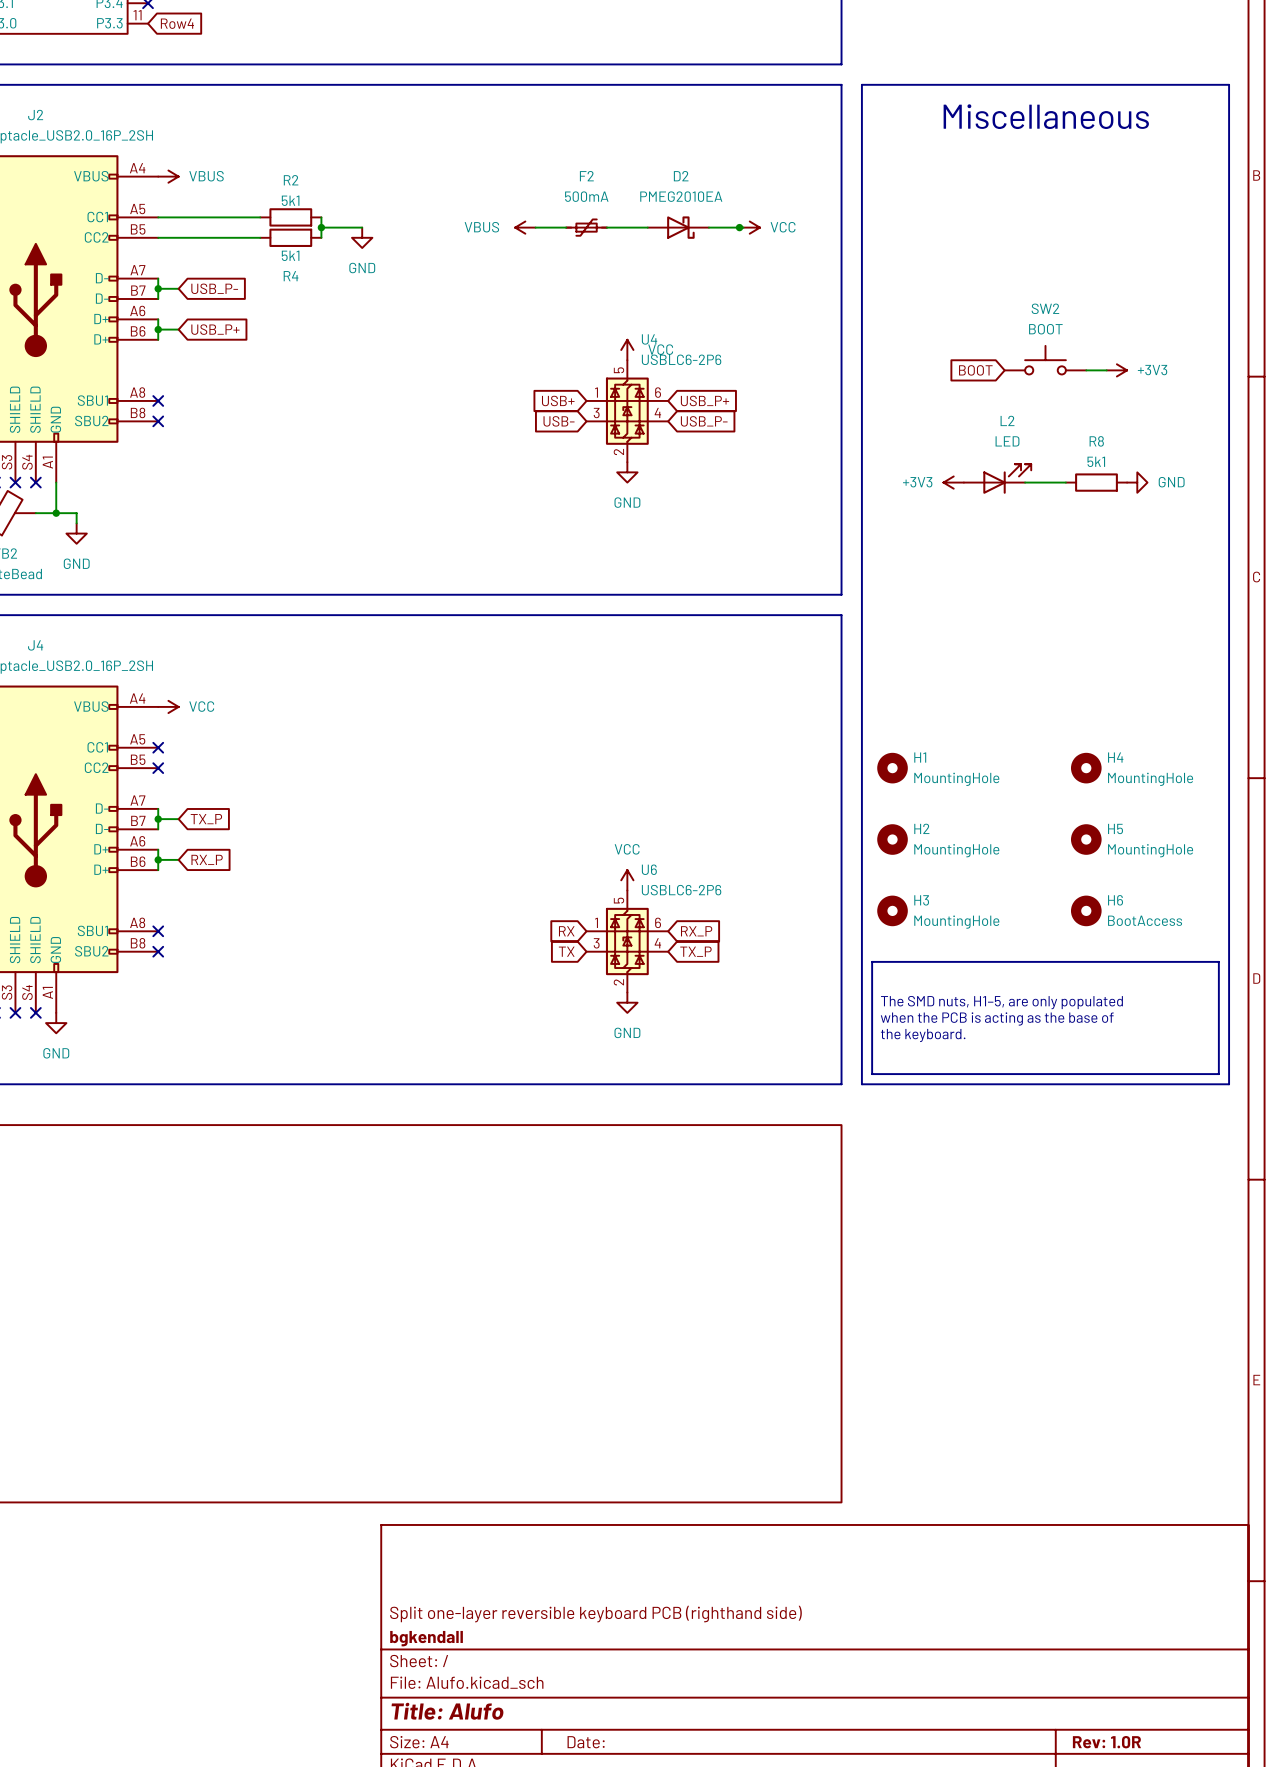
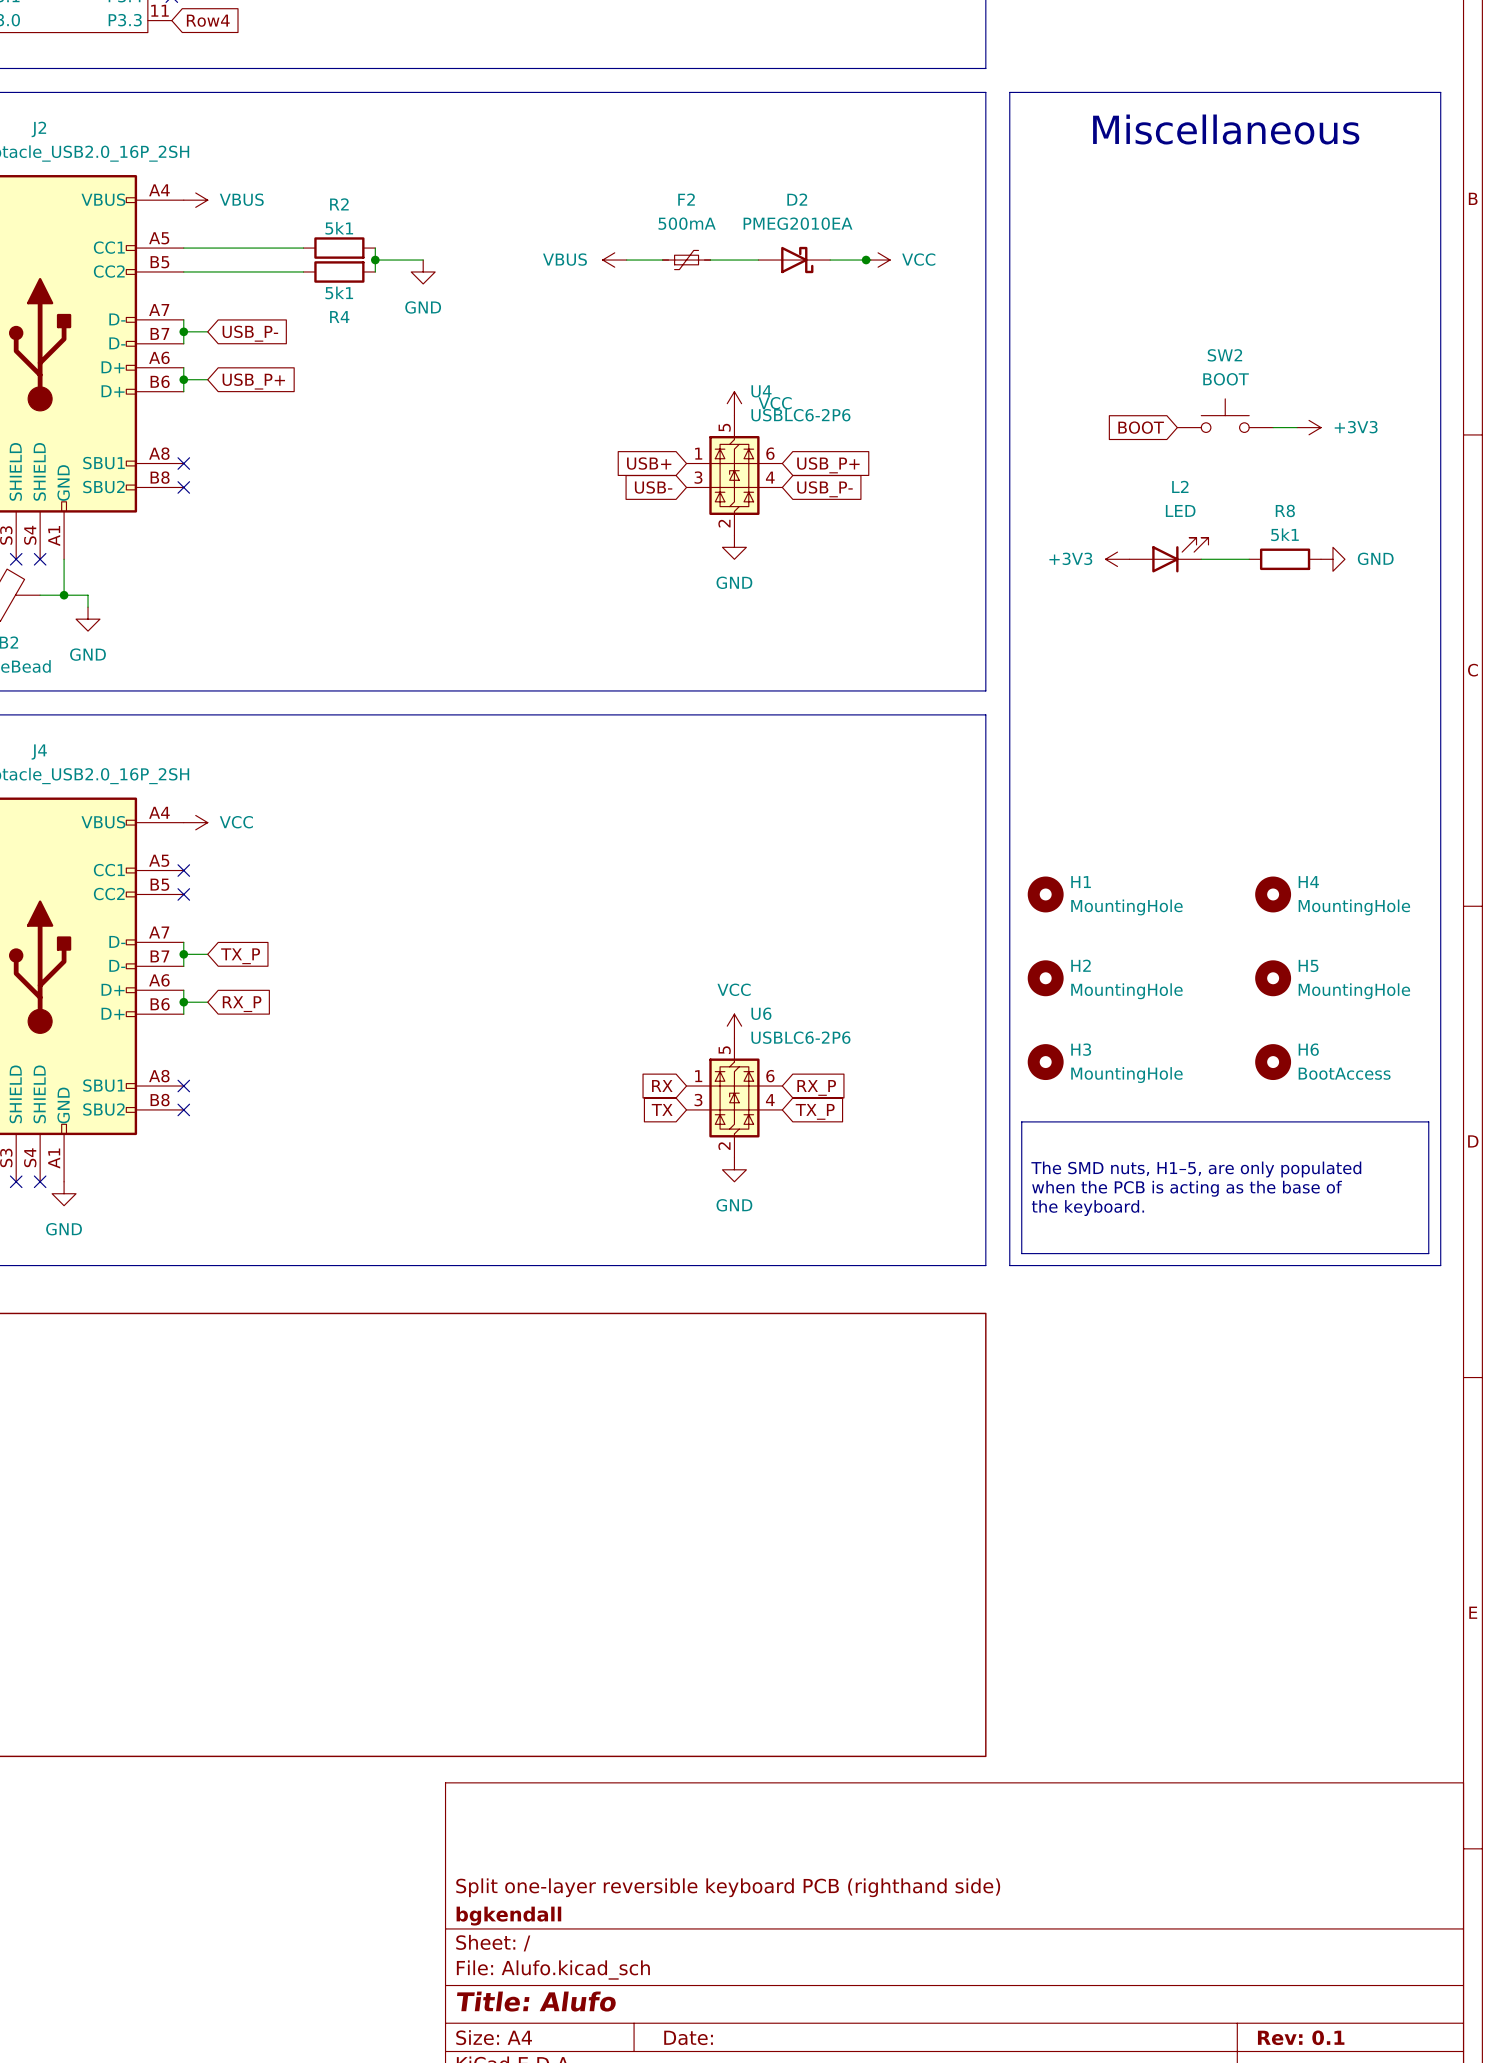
title block: Rev: 1.0R (1106, 1742) -> Rev: 0.1 (1301, 2037)

